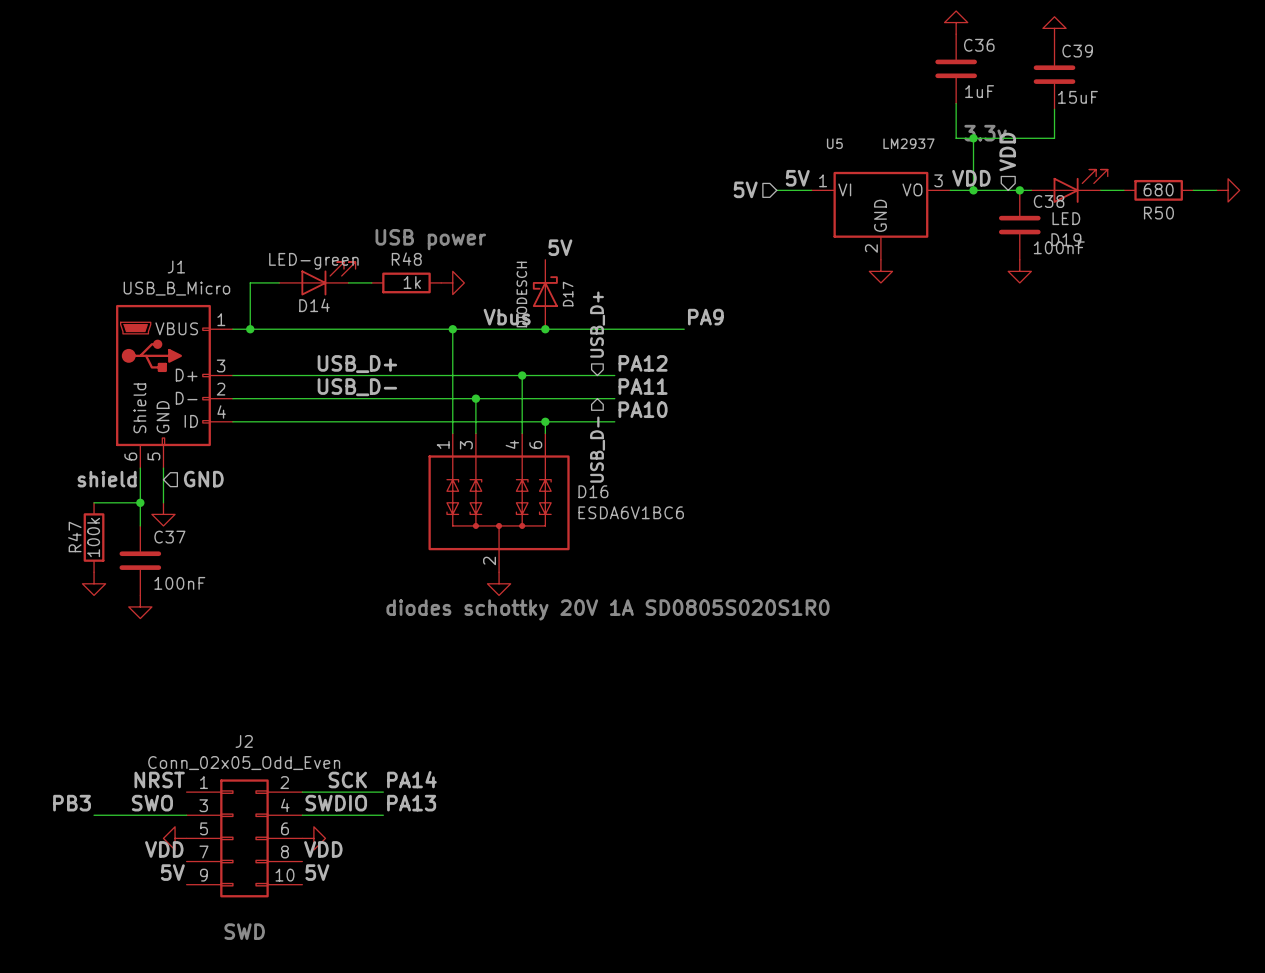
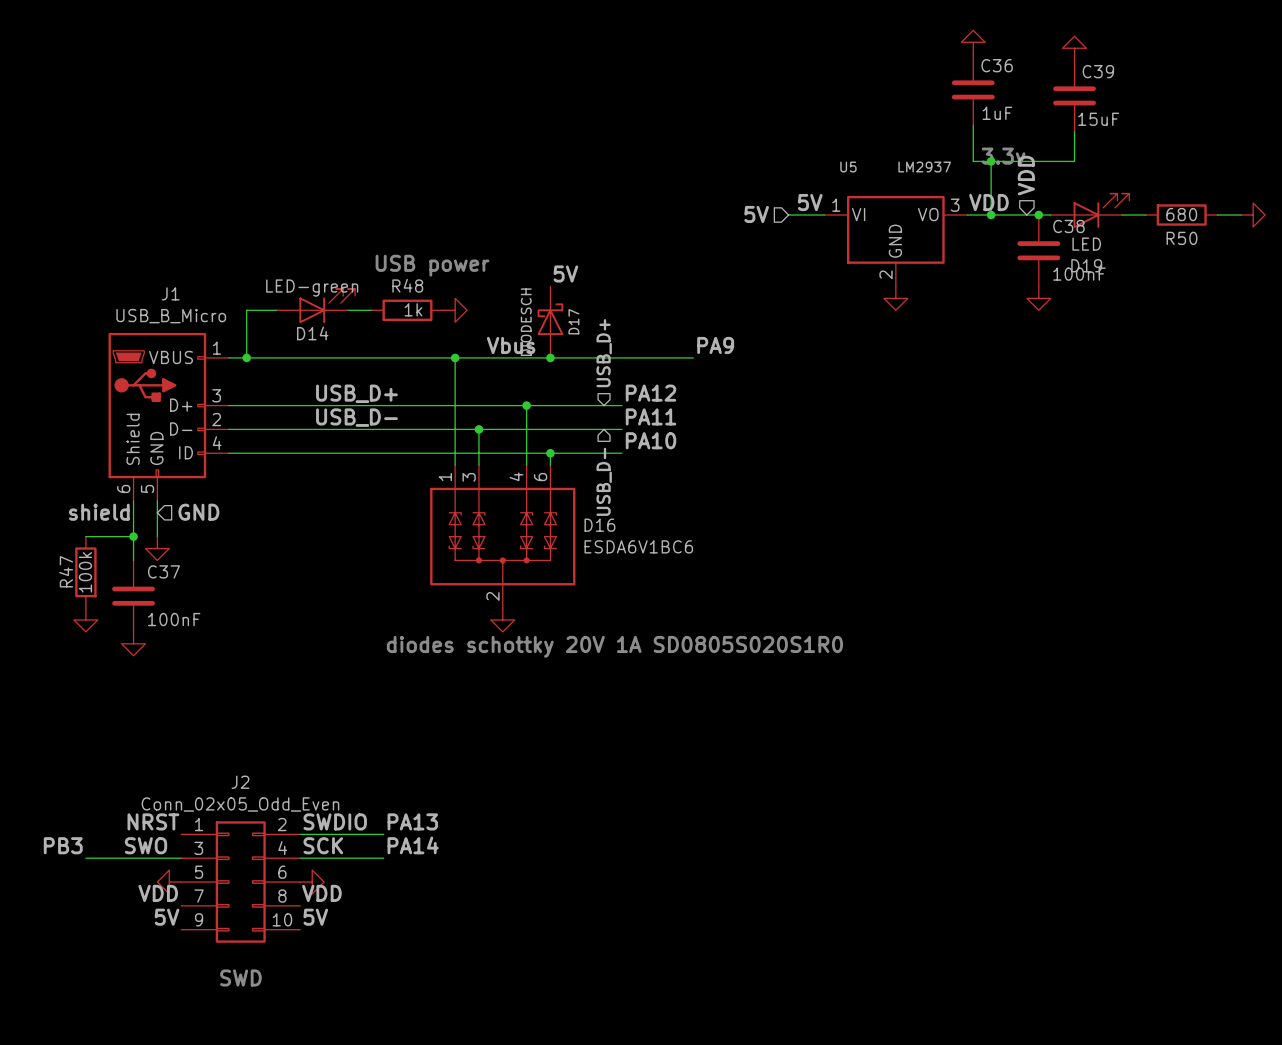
label: PA14 (411, 779) -> PA13 (412, 821)
label: none -> SWDIO (335, 821)
label: SCK (347, 780) -> none
label: SWDIO (336, 803) -> SCK (323, 845)
label: PA13 (411, 803) -> PA14 (413, 845)

